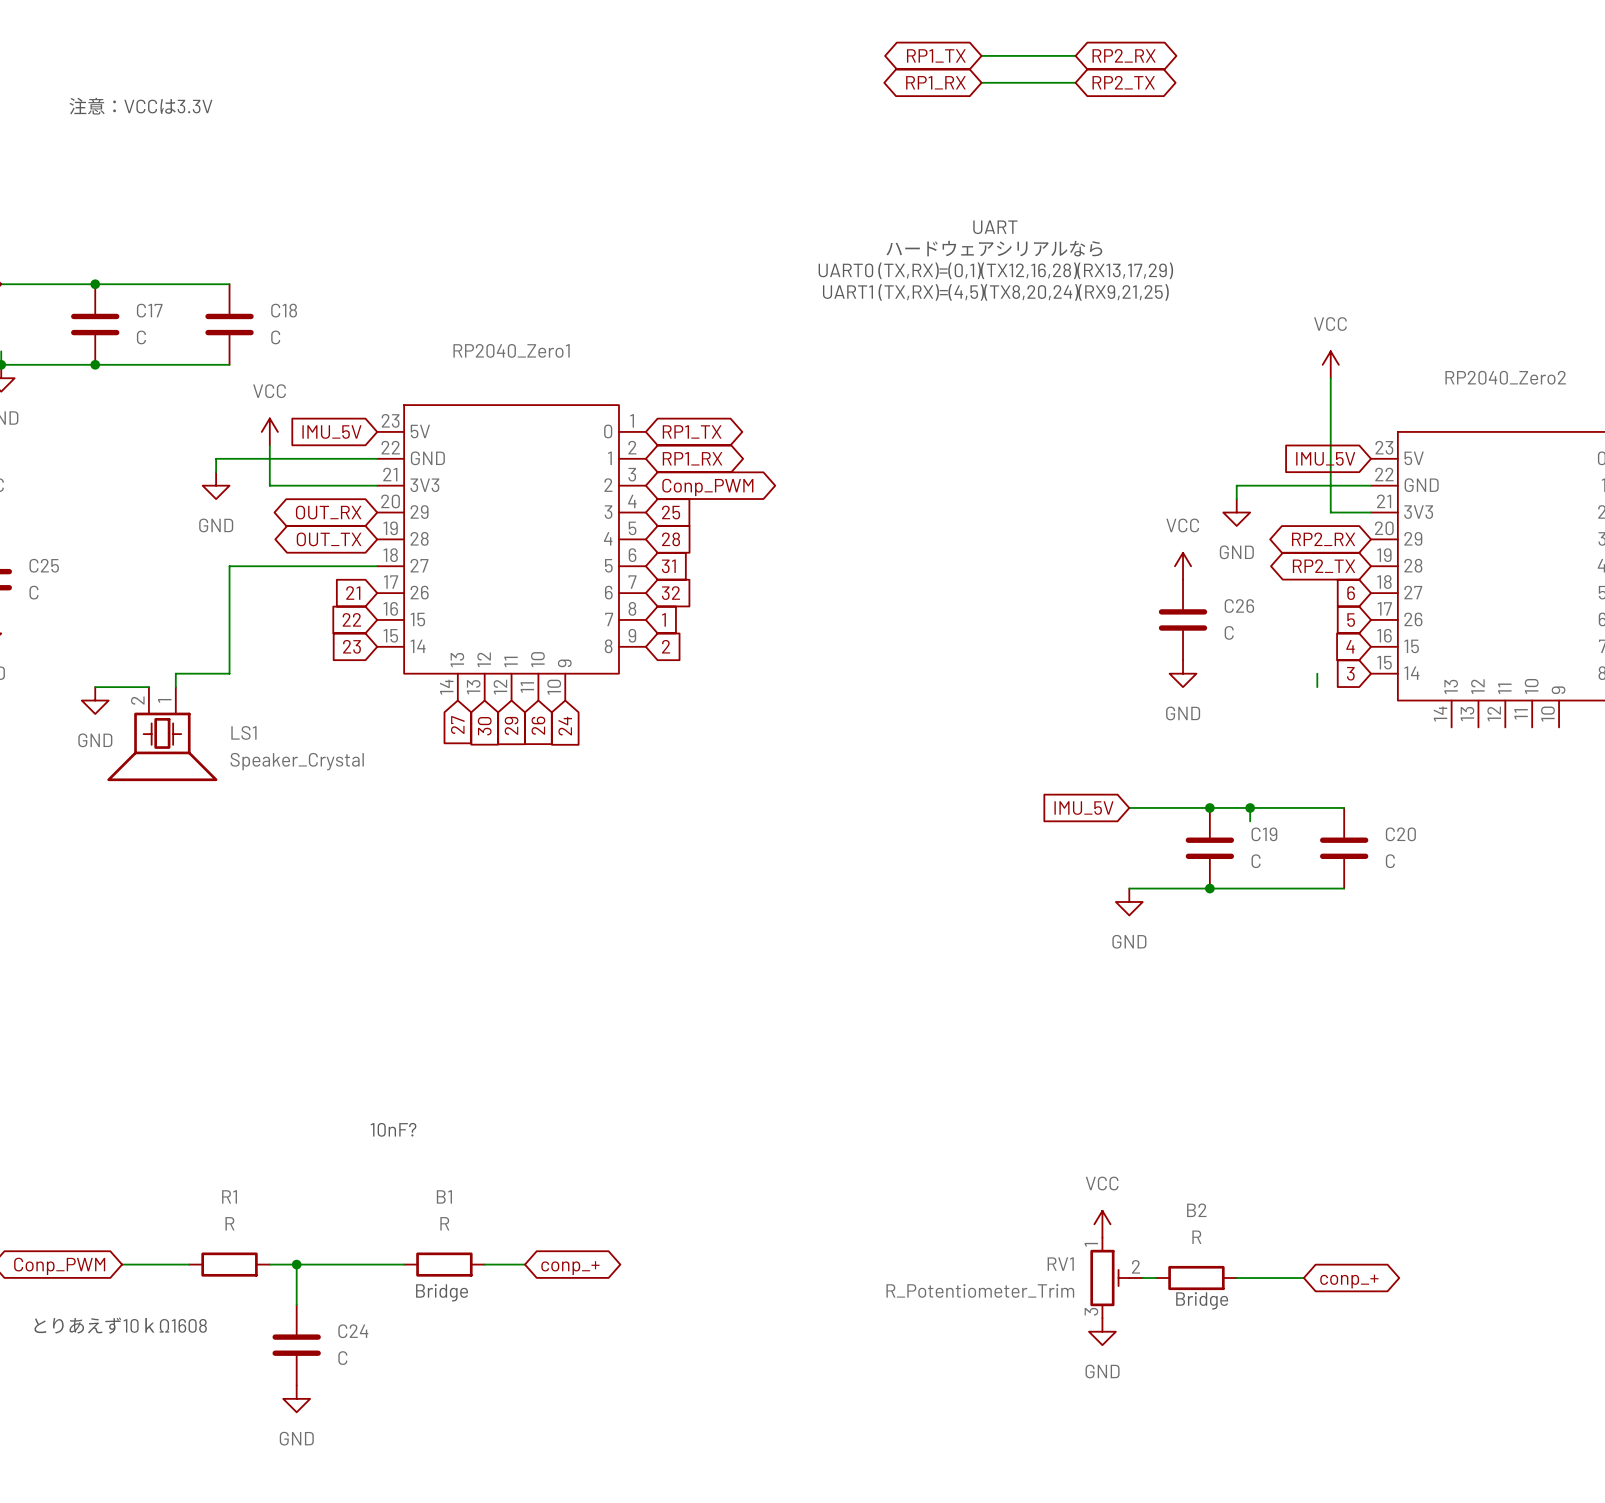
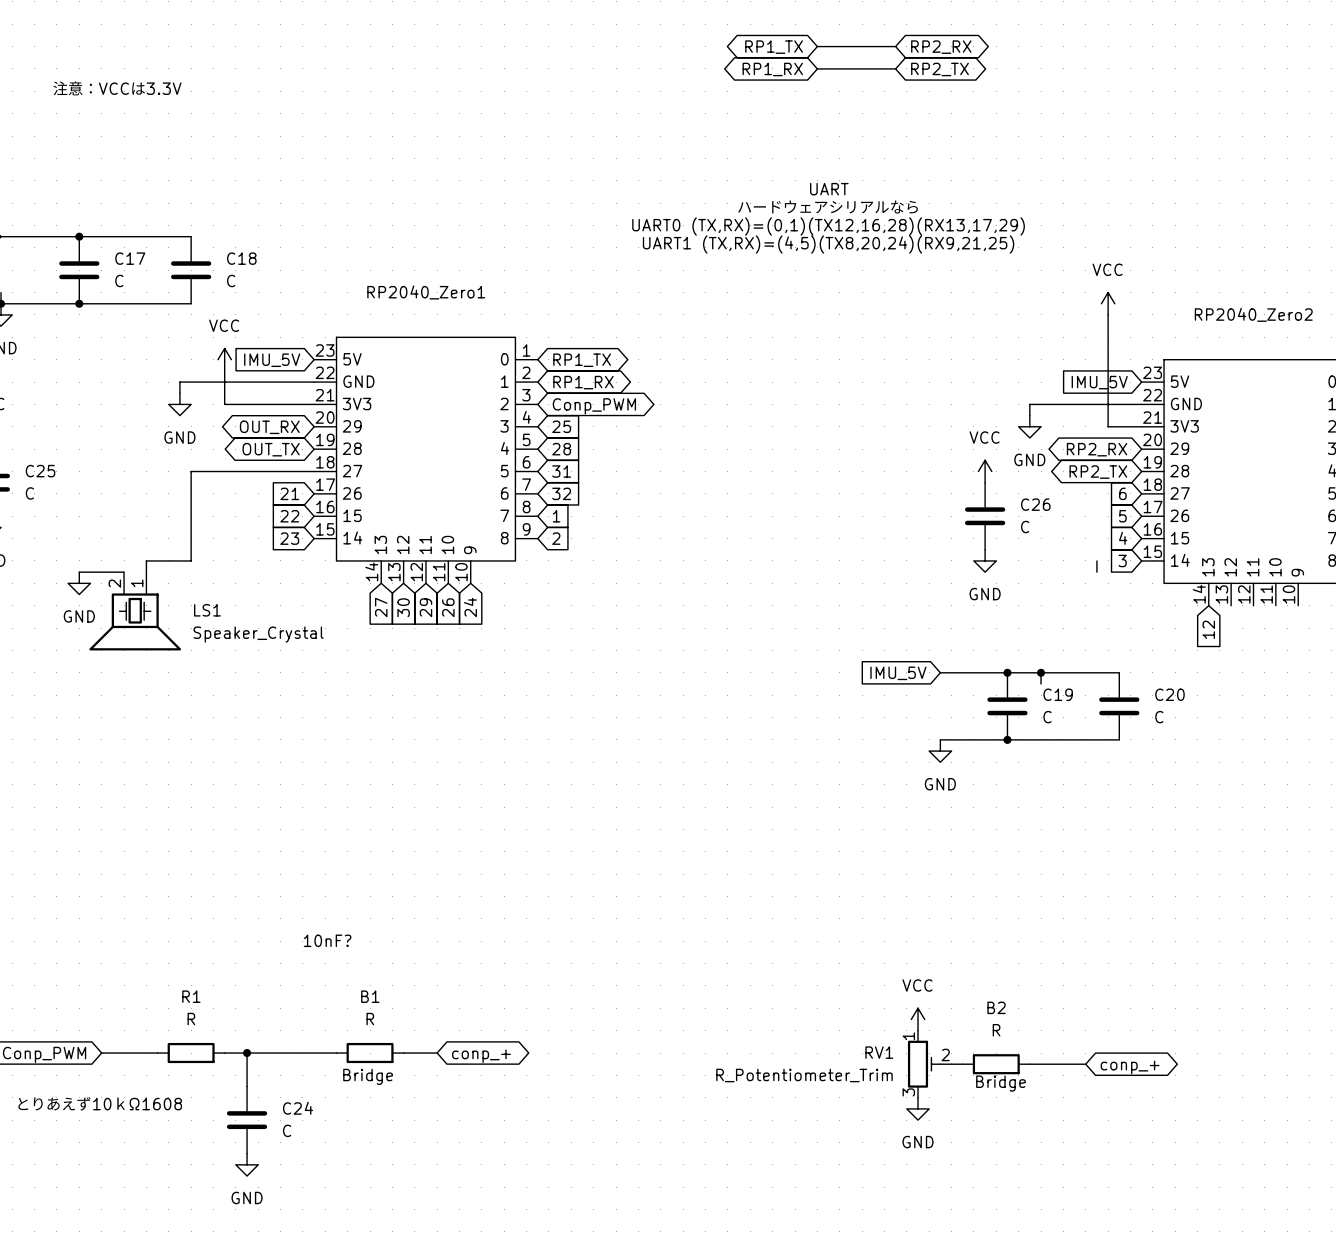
global label: none -> 12 (1208, 629)

